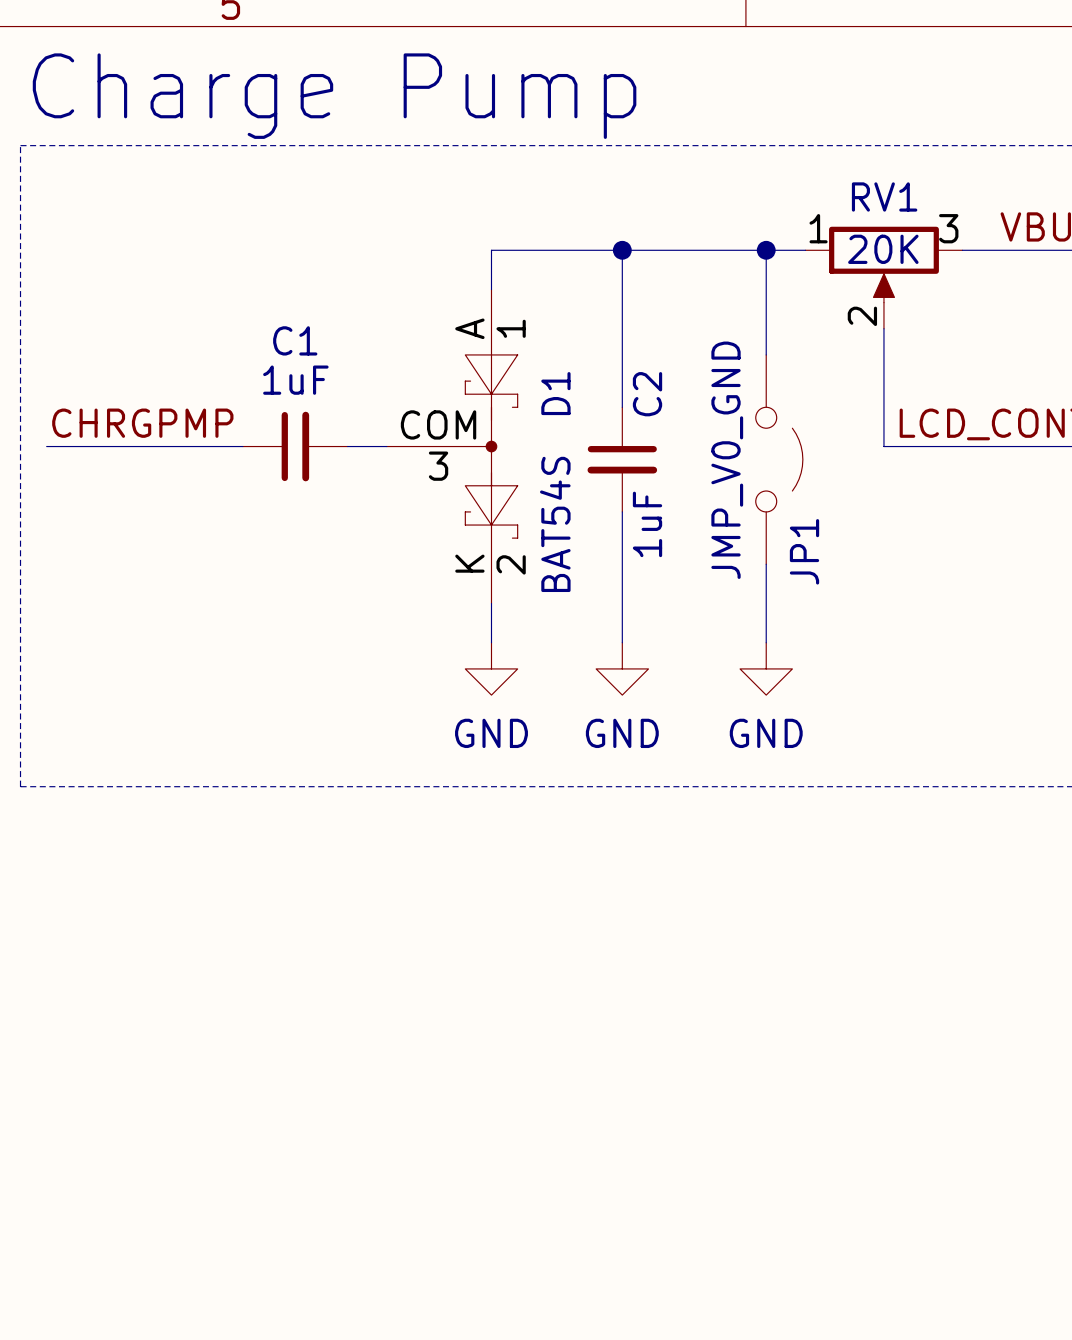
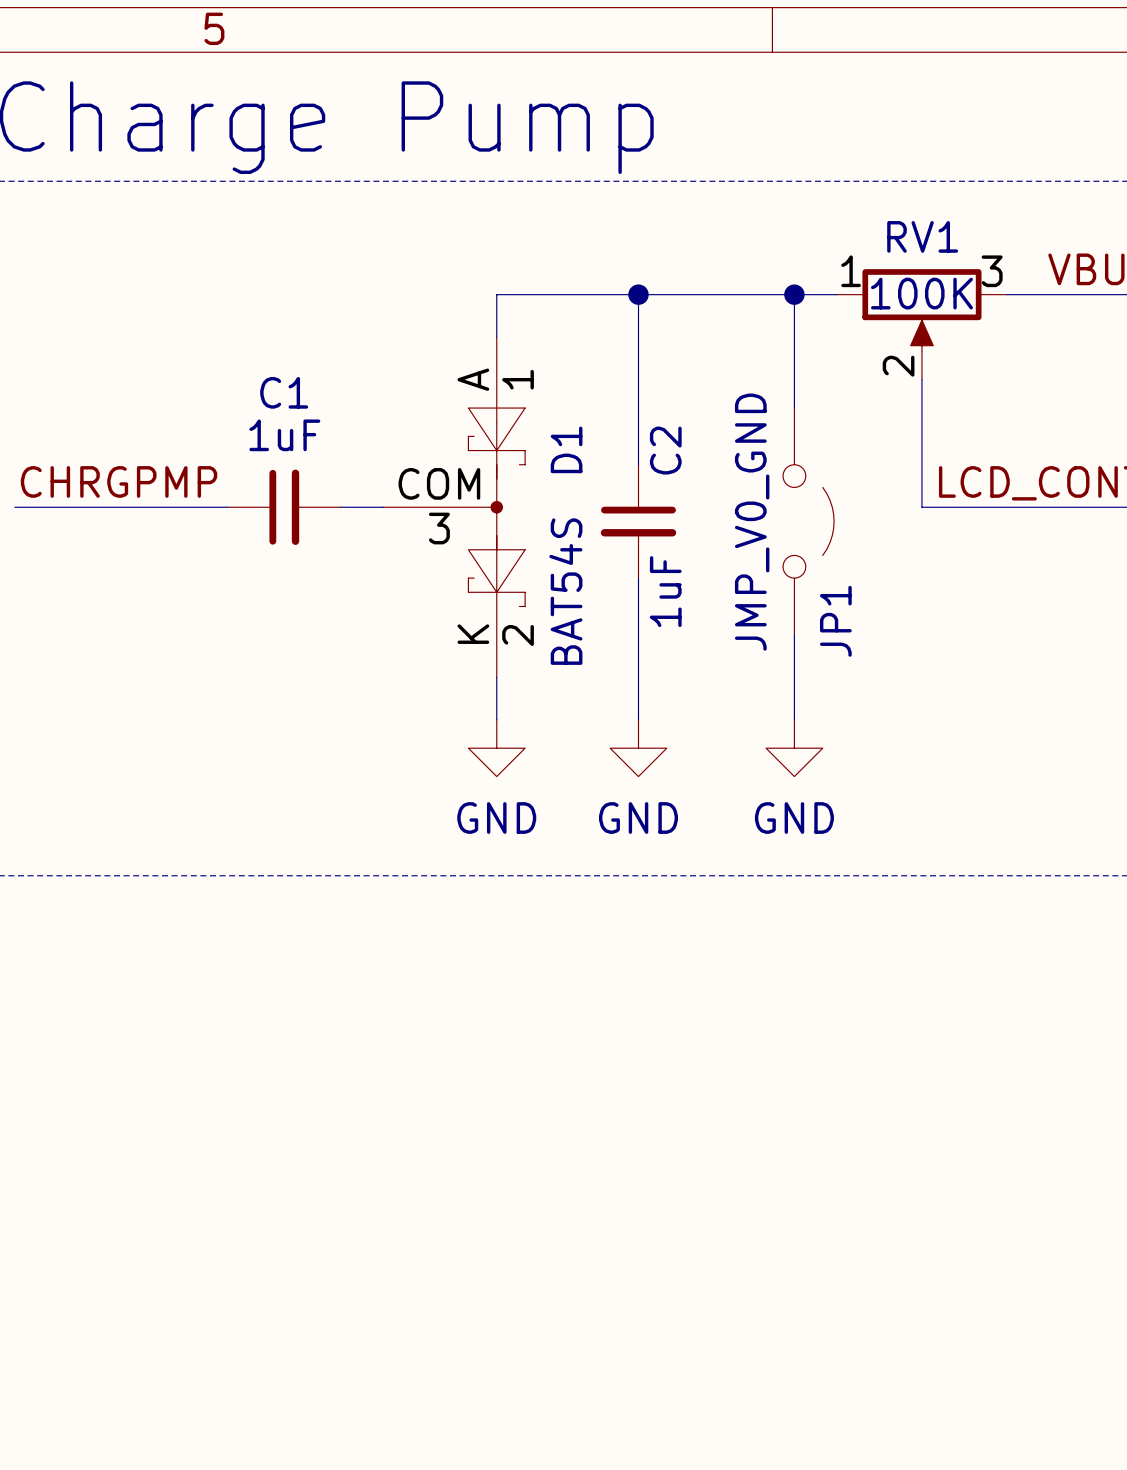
RV1 value: 20K (883, 249) -> 100K (921, 293)

